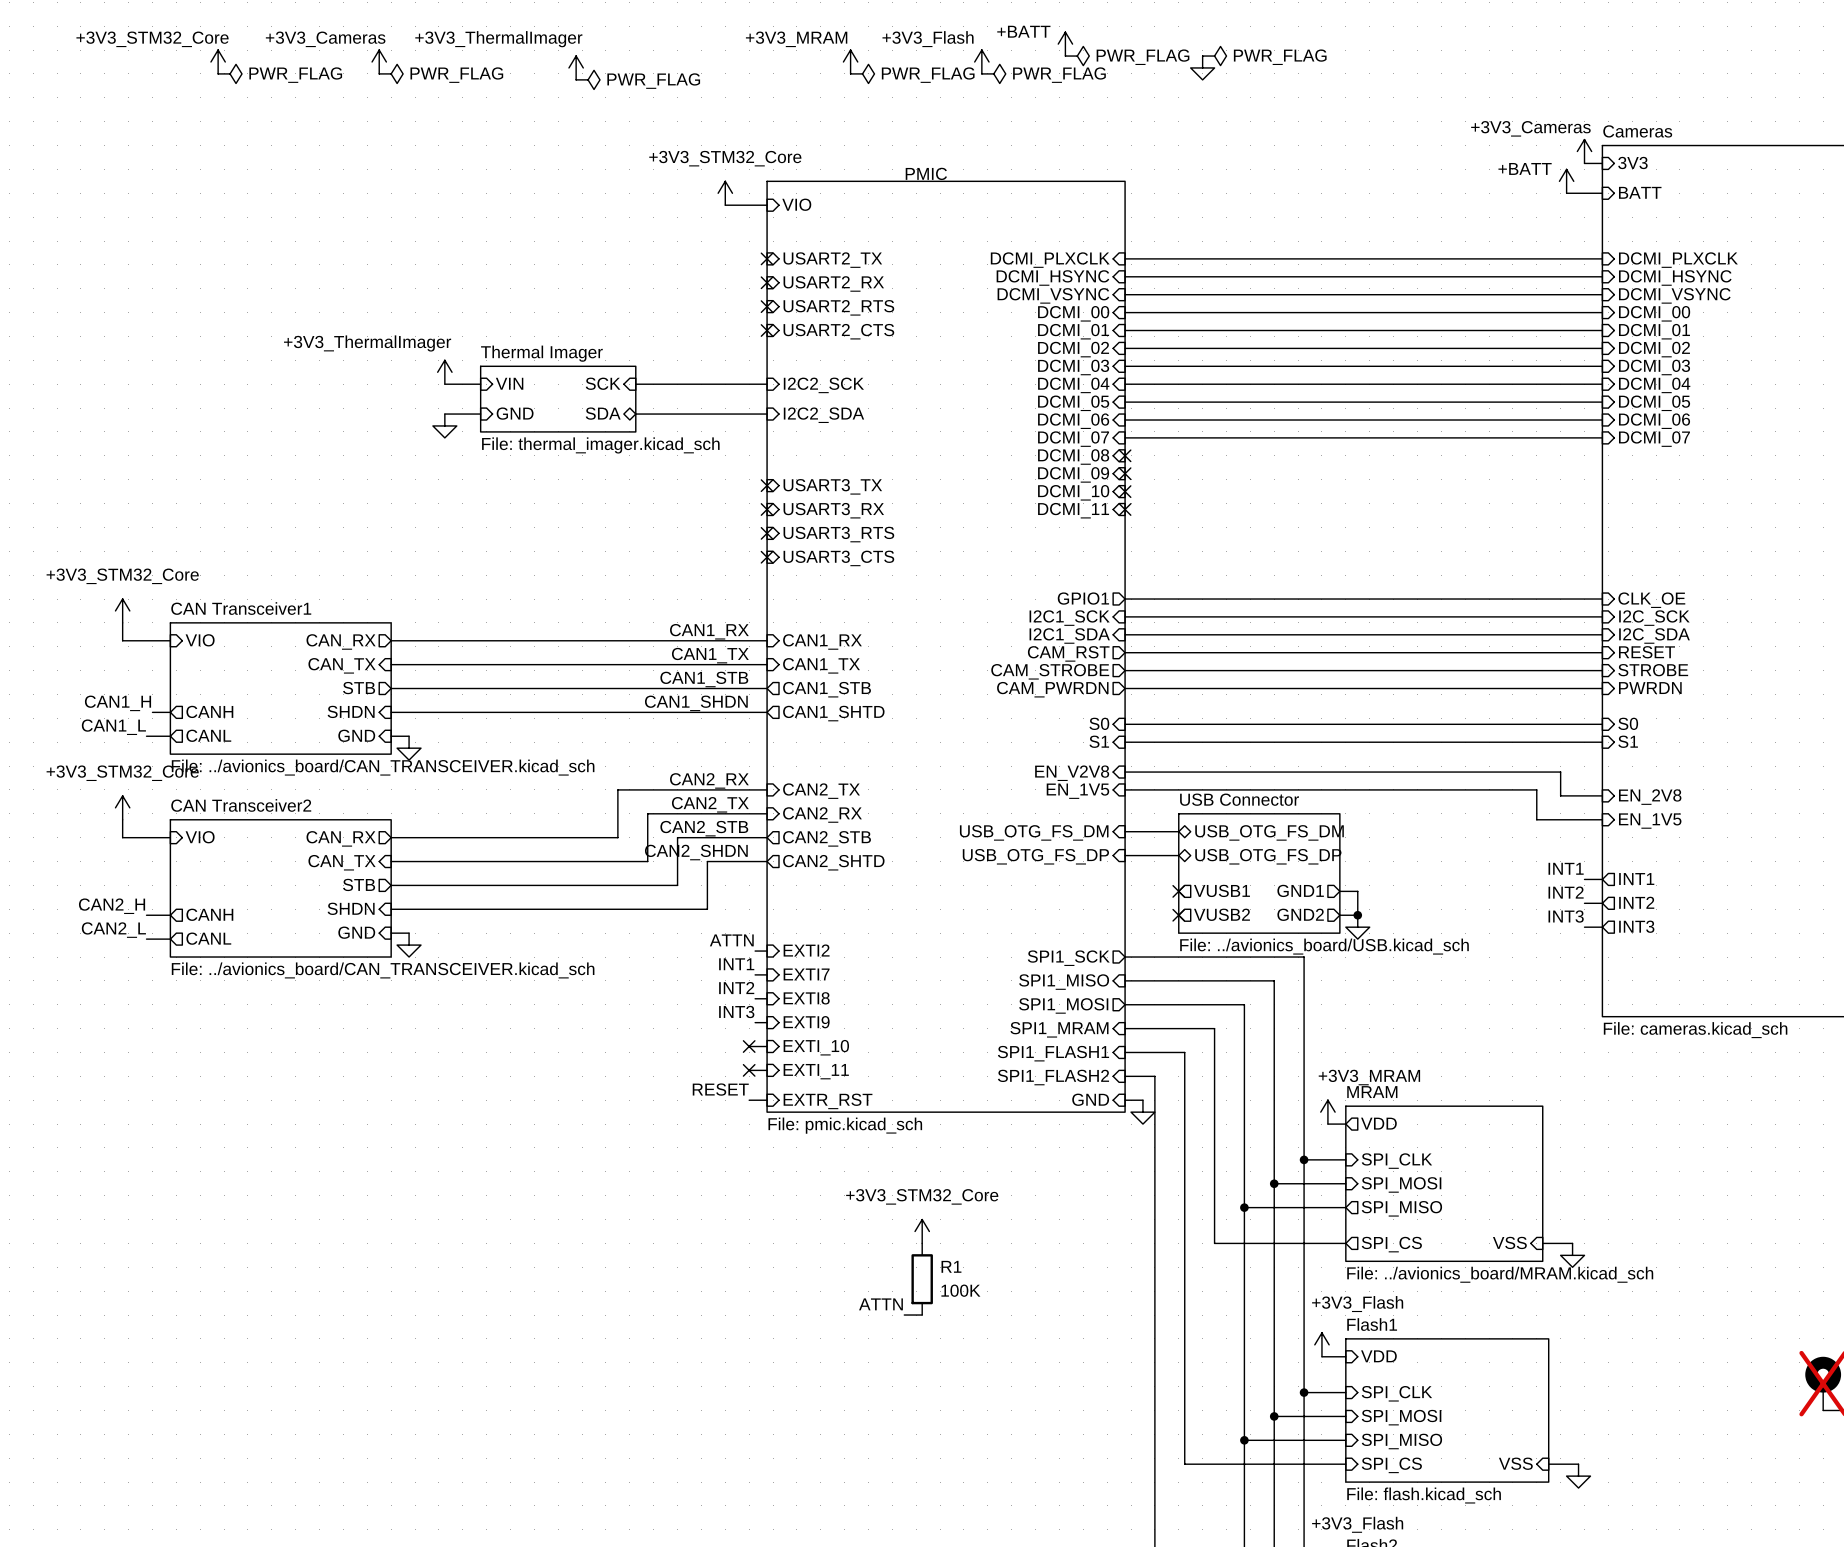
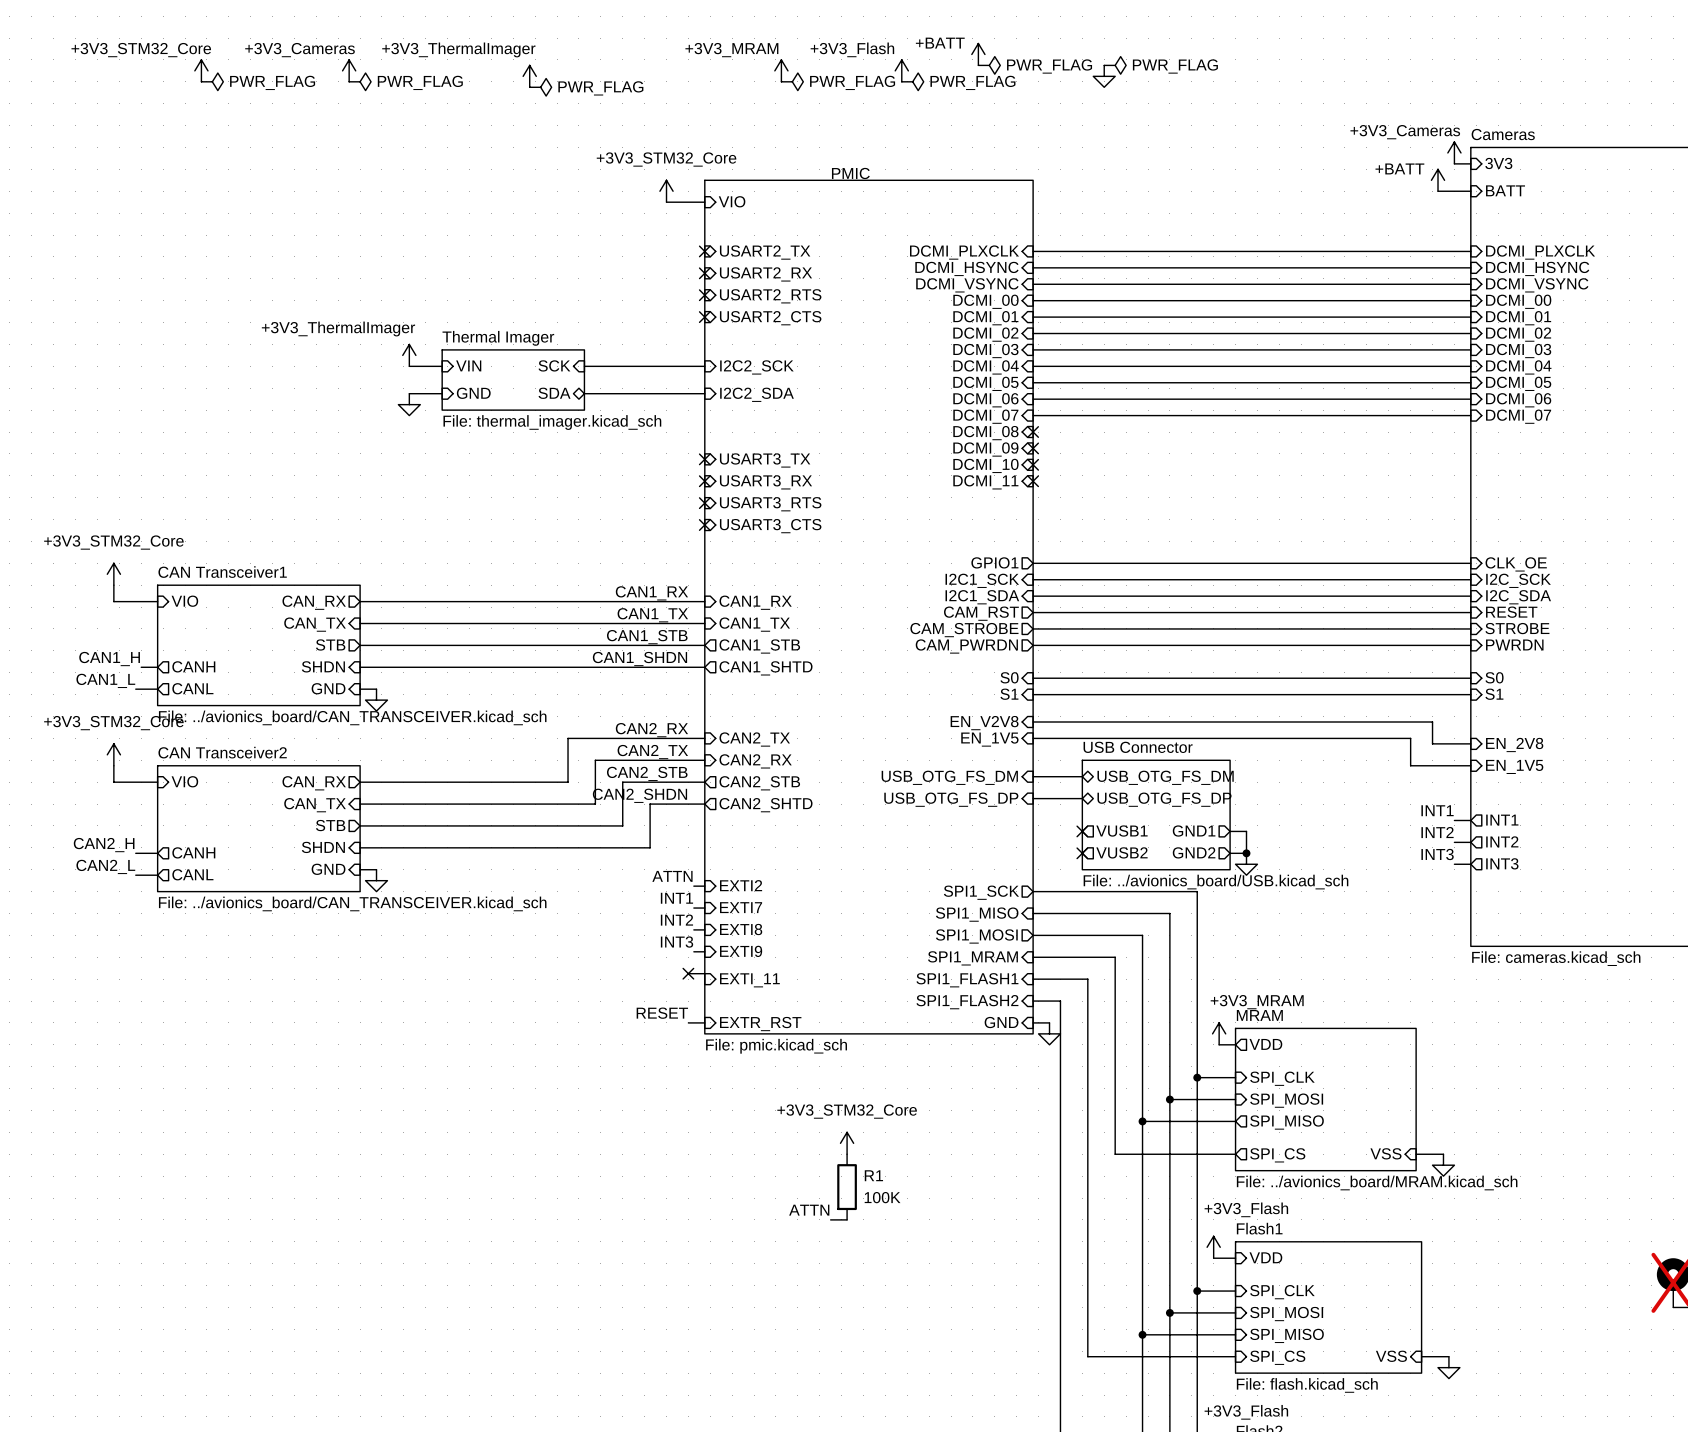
sheet pin: EXTI_10 (816, 1047) -> EXTI_11 (749, 980)
wire: (749, 1070) (767, 1070) -> none
no-connect mark: (749, 1070) -> none
sheet pin: EXTI_11 (816, 1071) -> none

